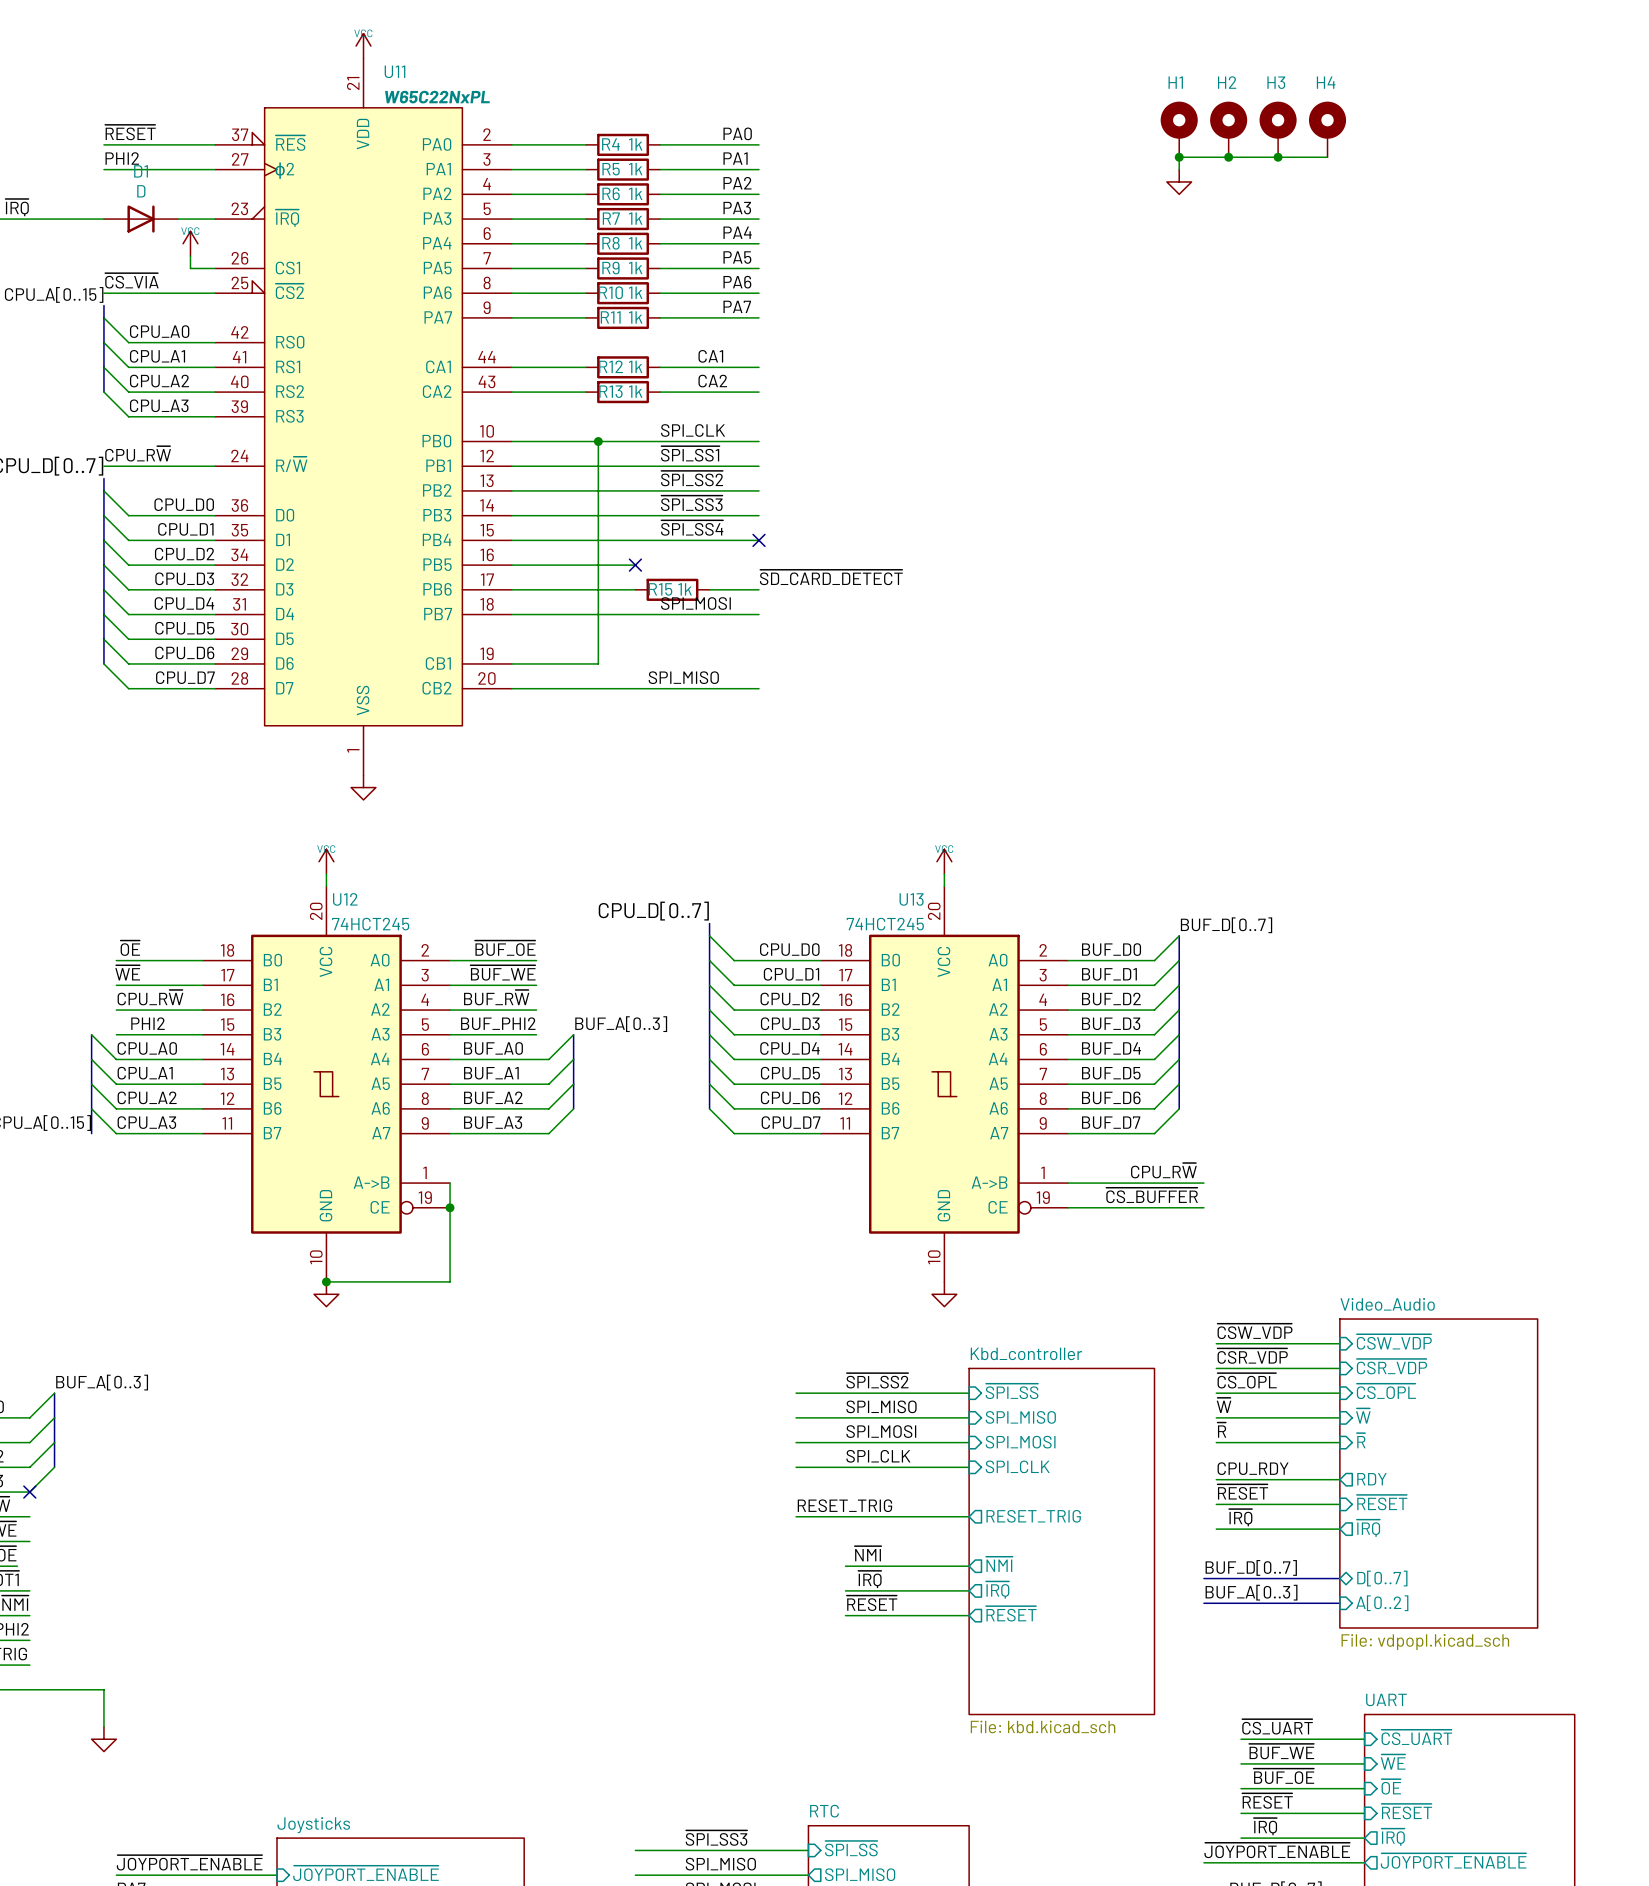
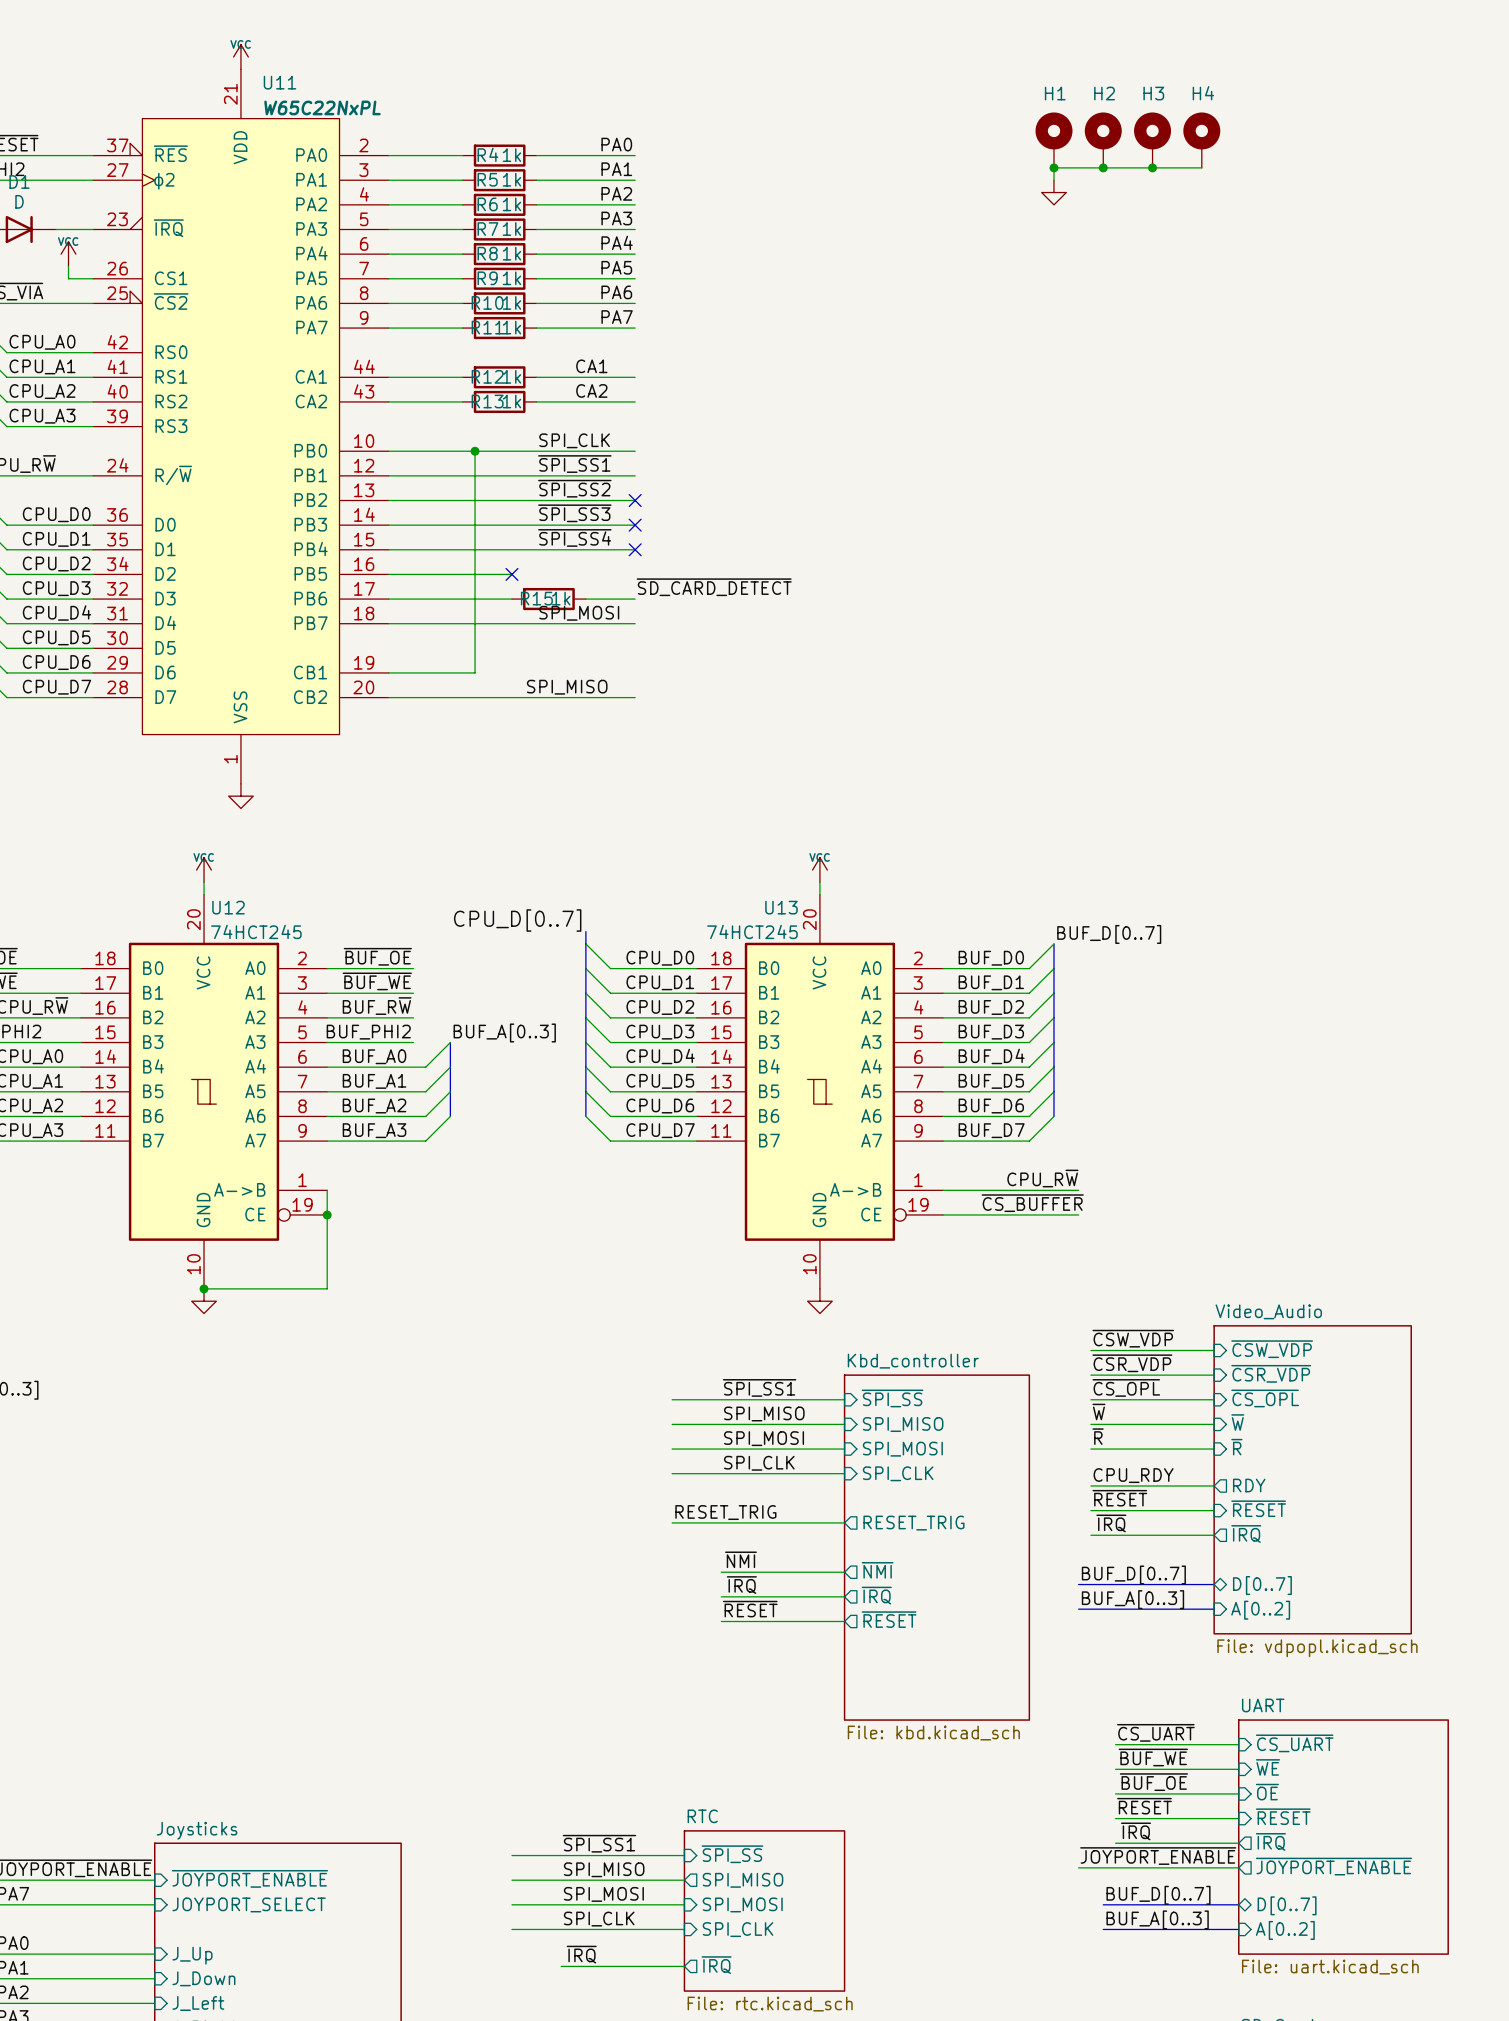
no-connect mark: none -> (635, 500)
no-connect mark: none -> (635, 525)
label: ~{SPI_SS2} (877, 1380) -> ~{SPI_SS1} (759, 1387)
label: ~{SPI_SS3} (716, 1838) -> ~{SPI_SS1} (599, 1843)

